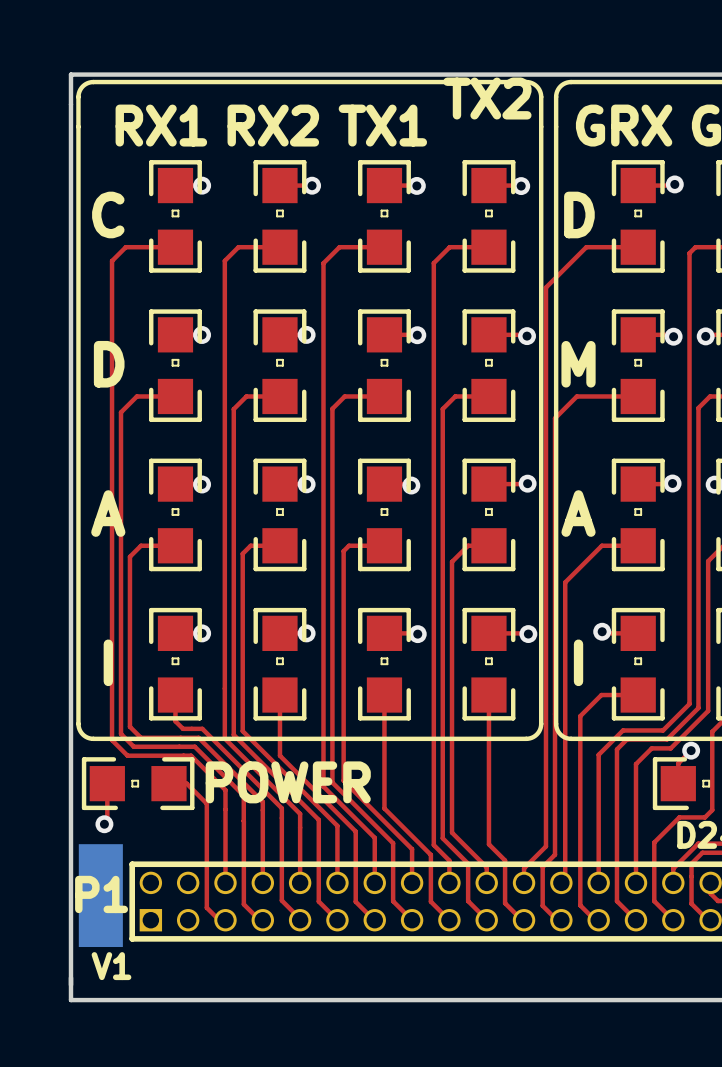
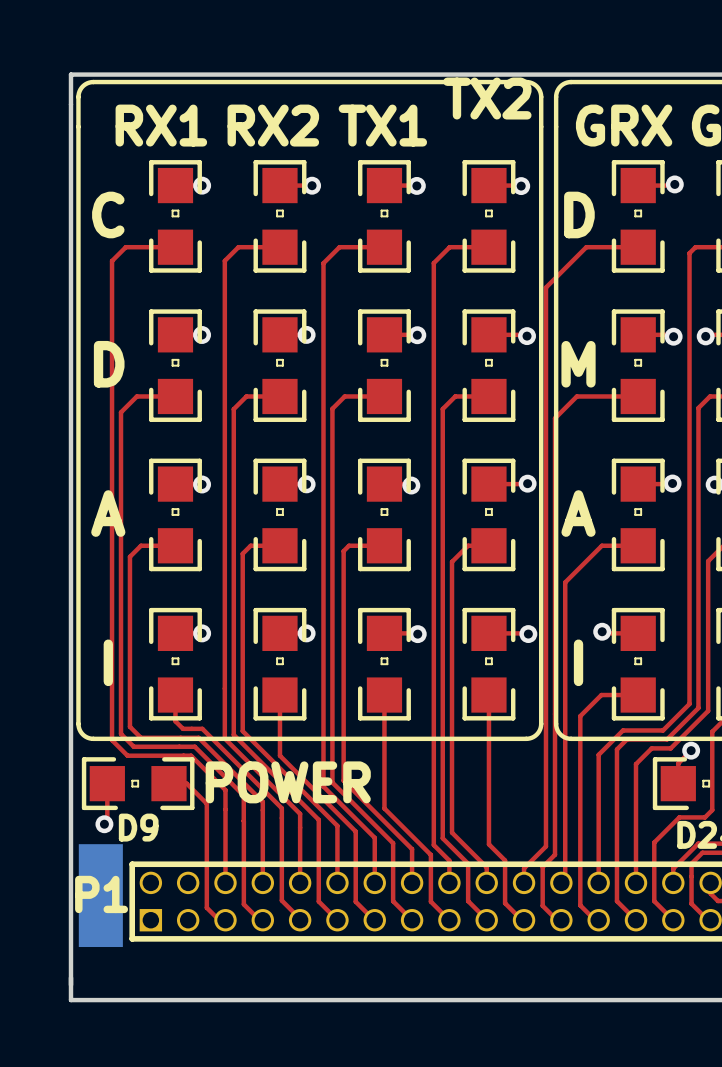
D9 name: none -> D9 (138, 827)
text: V1 (111, 966) -> none

